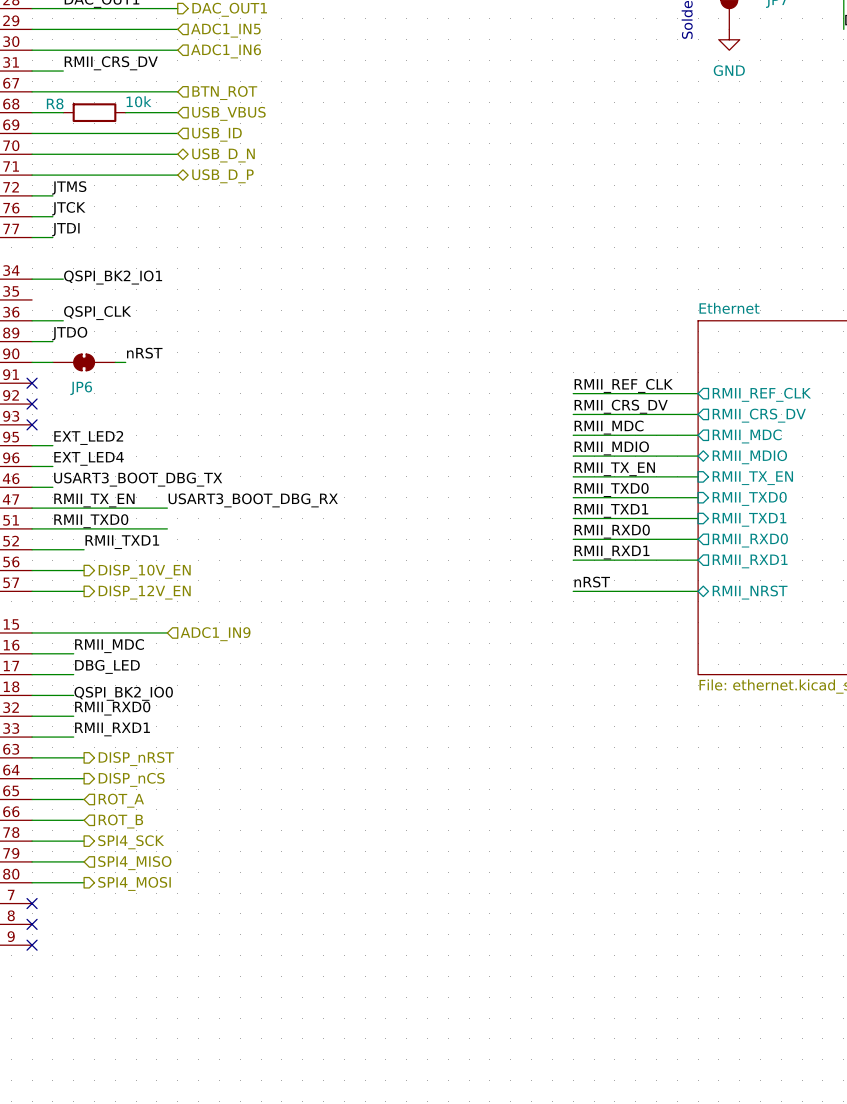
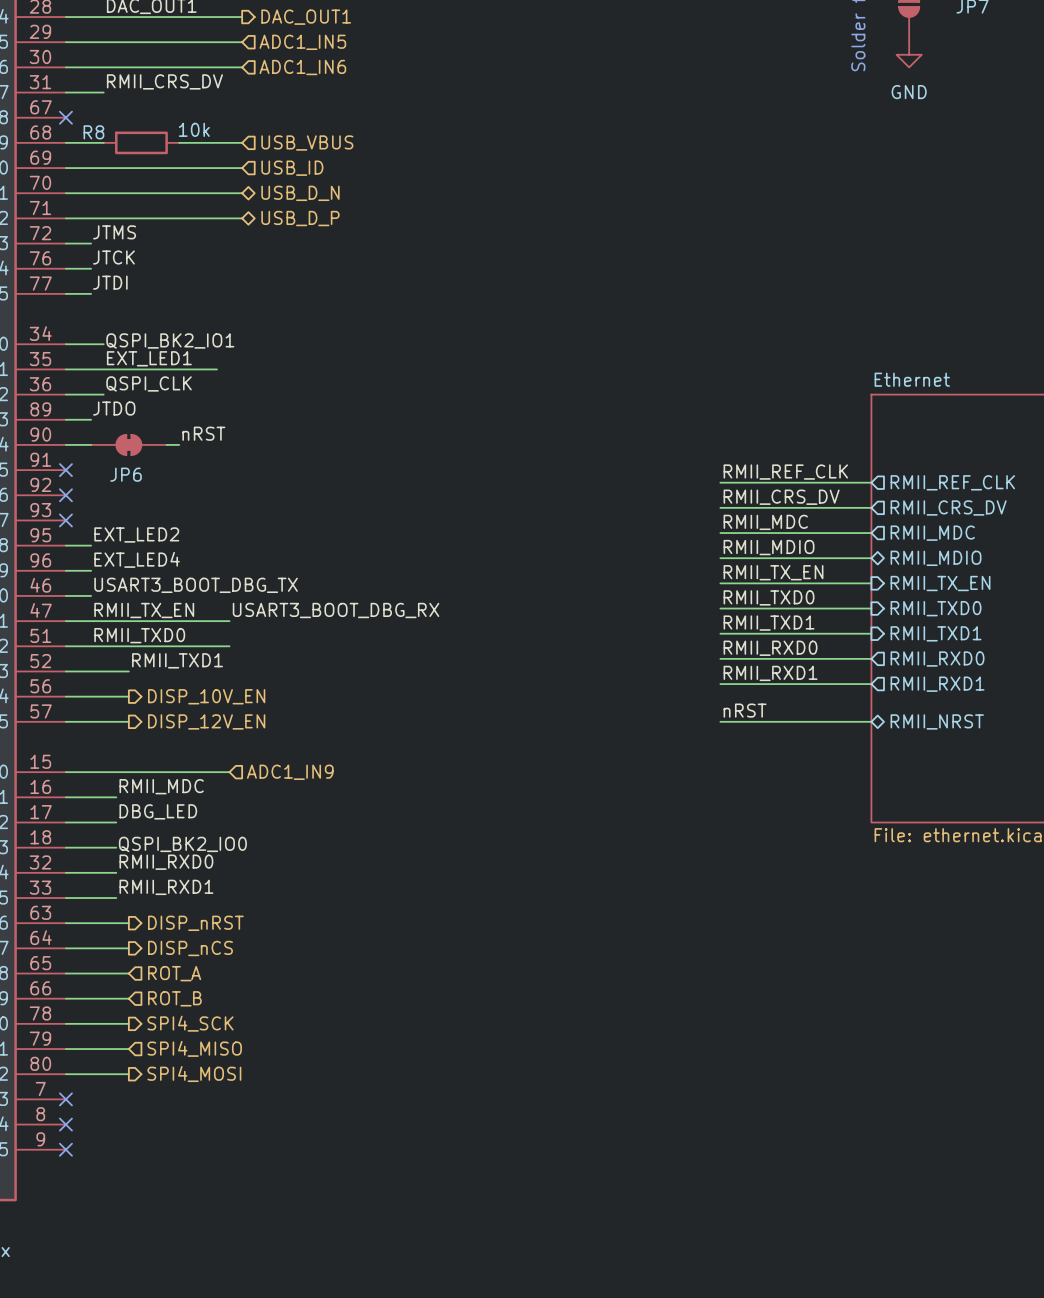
wire: (32, 91) (177, 91) -> none
no-connect mark: none -> (65, 117)
hierarchical label: BTN_ROT (224, 93) -> none
label: none -> EXT_LED1 (149, 358)
wire: none -> (65, 369) (216, 369)

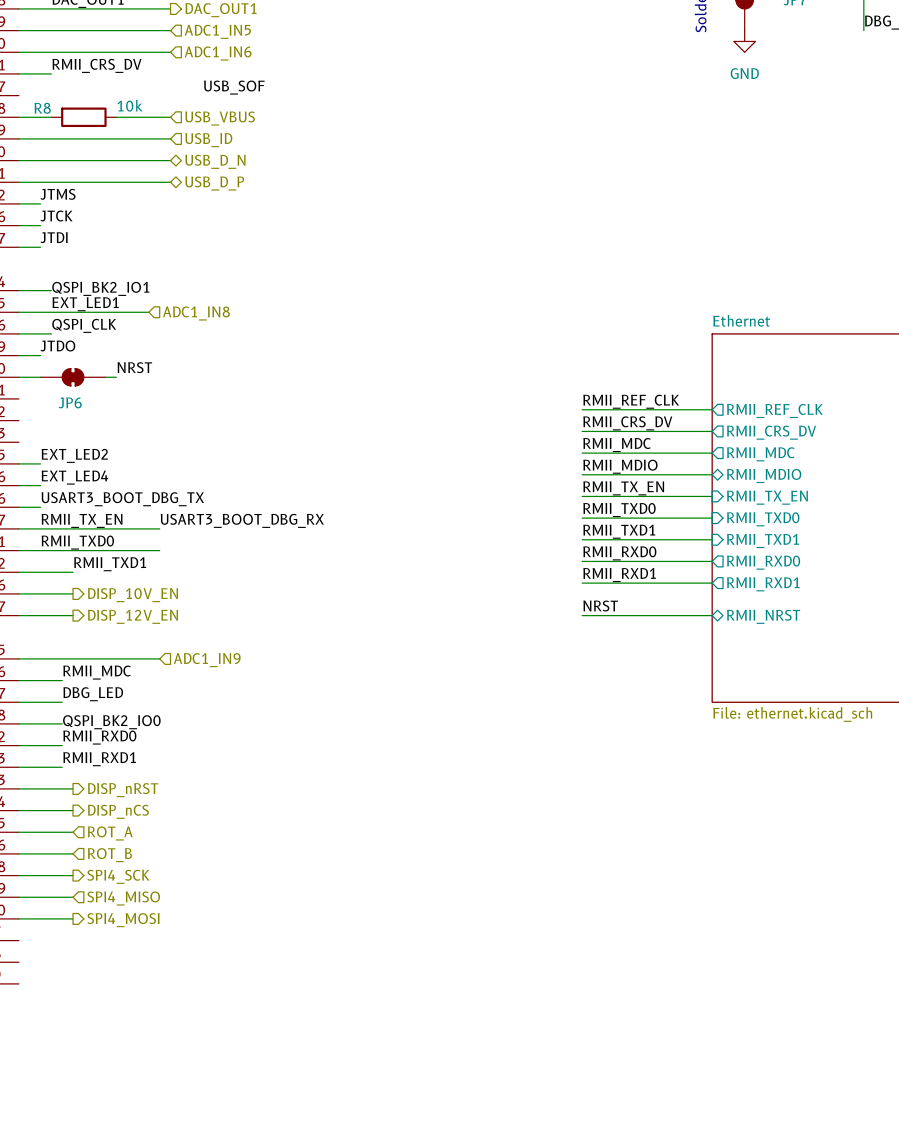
label: none -> USB_SOF (234, 87)
no-connect mark: (65, 117) -> none
hierarchical label: none -> ADC1_IN8 (196, 313)
label: nRST (203, 433) -> NRST (134, 367)
no-connect mark: (65, 470) -> none
no-connect mark: (65, 495) -> none
no-connect mark: (65, 520) -> none
label: nRST (745, 710) -> NRST (600, 605)
no-connect mark: (65, 1099) -> none
no-connect mark: (65, 1124) -> none
no-connect mark: (65, 1149) -> none

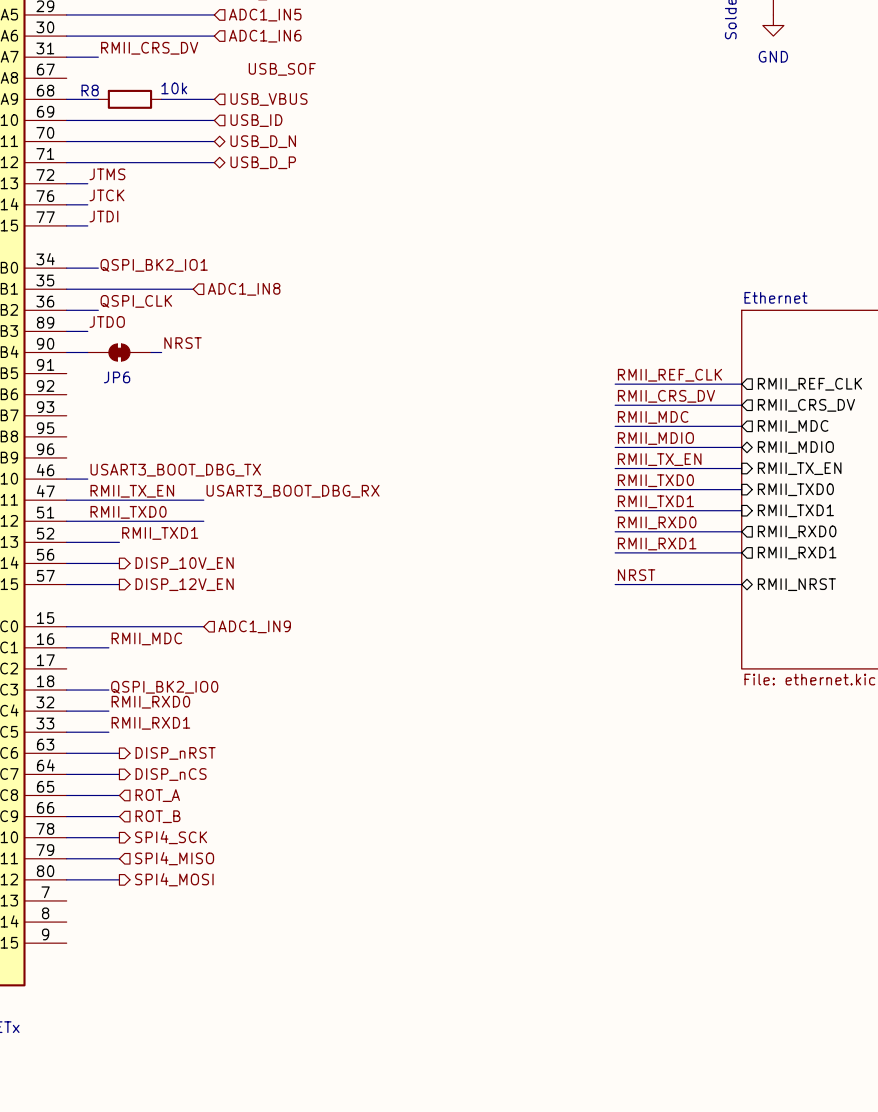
label: EXT_LED1 (85, 304) -> none
label: EXT_LED2 (74, 455) -> none
wire: (18, 463) (40, 463) -> none
label: EXT_LED4 (74, 477) -> none
wire: (18, 485) (40, 485) -> none
label: DBG_LED (93, 694) -> none
wire: (18, 702) (62, 702) -> none

